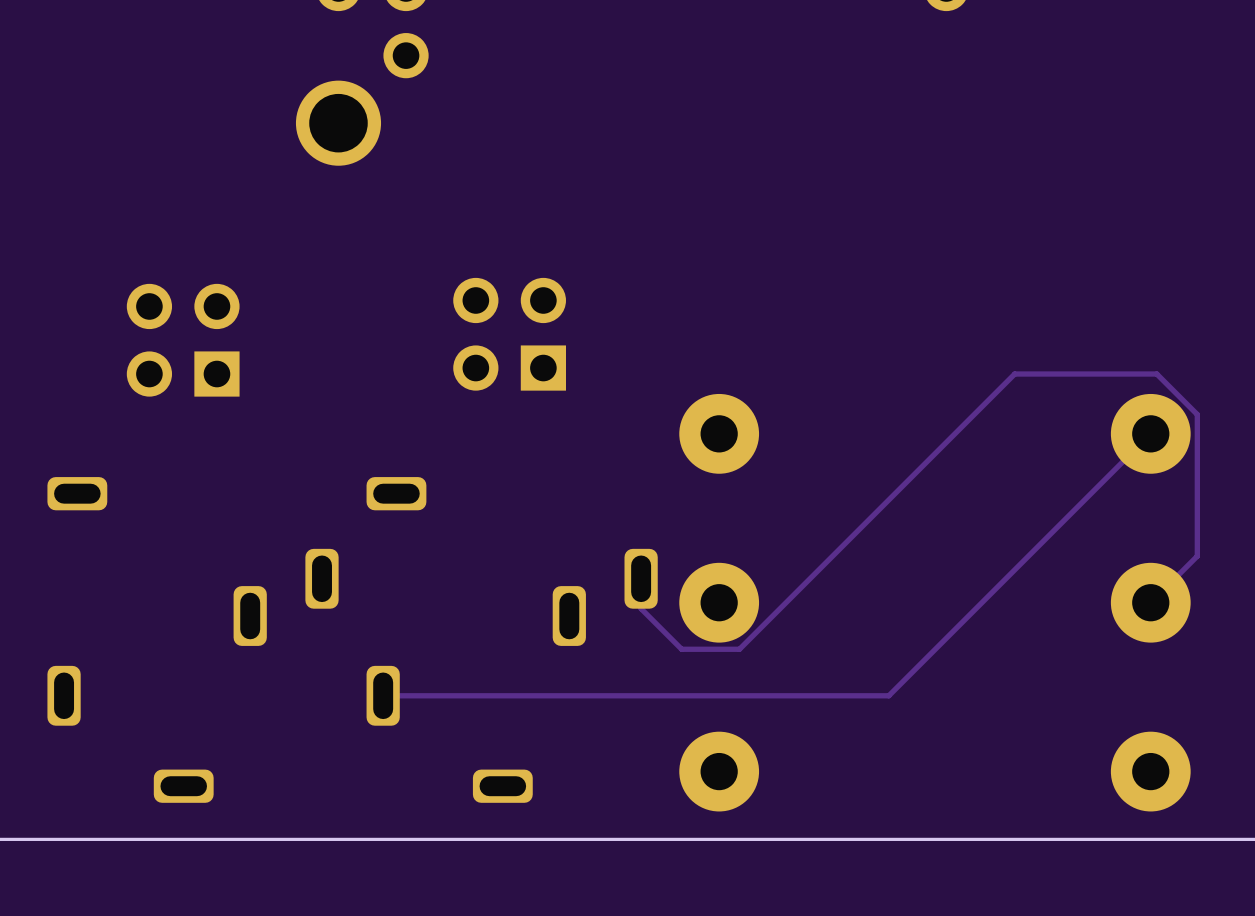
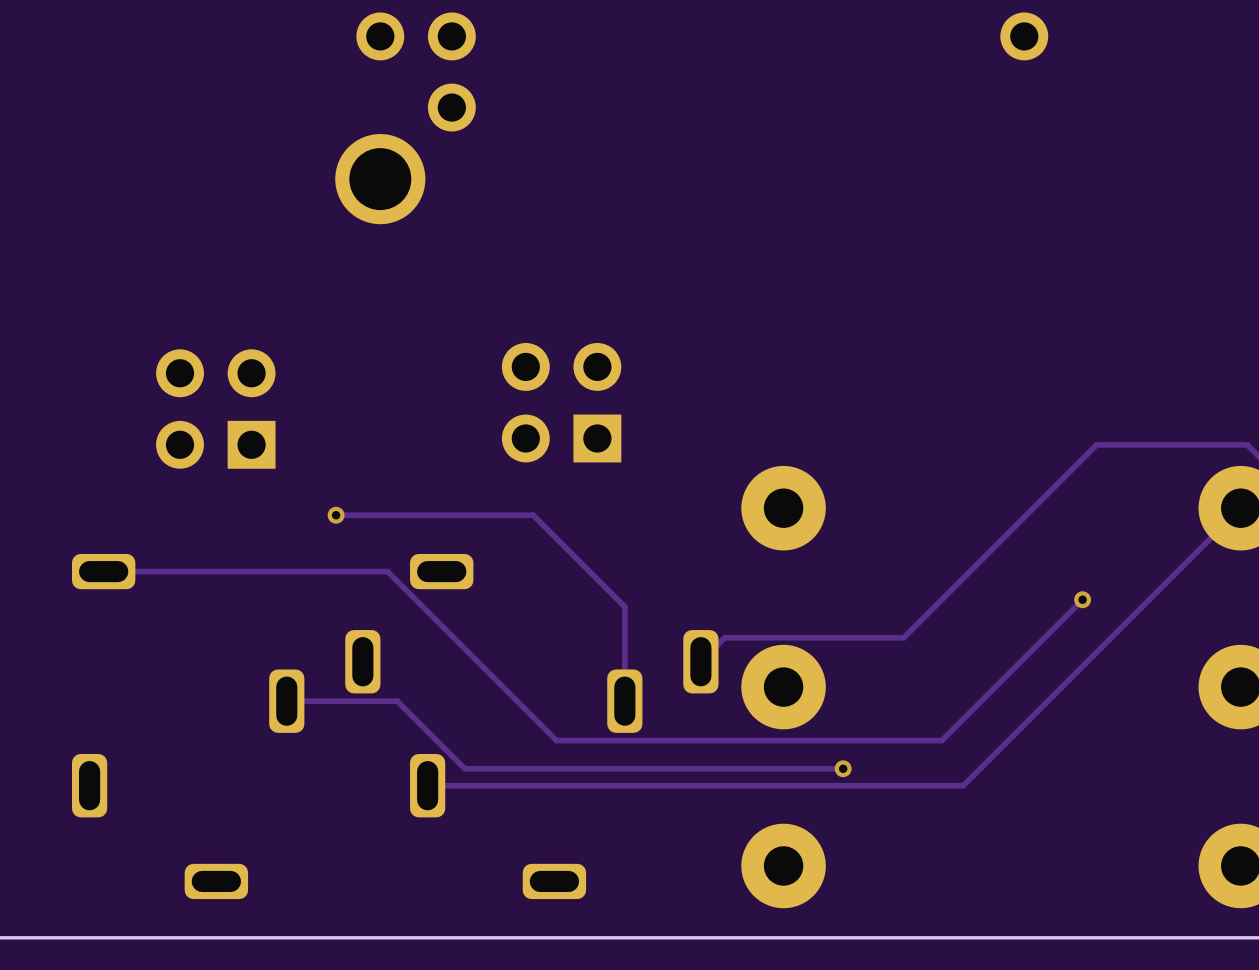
track: none -> (336, 515) (533, 515) (624, 606) (624, 701)
via: none -> (336, 515)
track: none -> (103, 571) (387, 571) (556, 740) (941, 740) (1082, 599)
via: none -> (1082, 599)
track: (832, 556) (739, 649) (681, 649) (641, 608) (641, 578) -> (903, 637) (724, 637) (700, 661)
track: none -> (286, 701) (397, 701) (464, 768) (843, 768)
via: none -> (843, 768)

